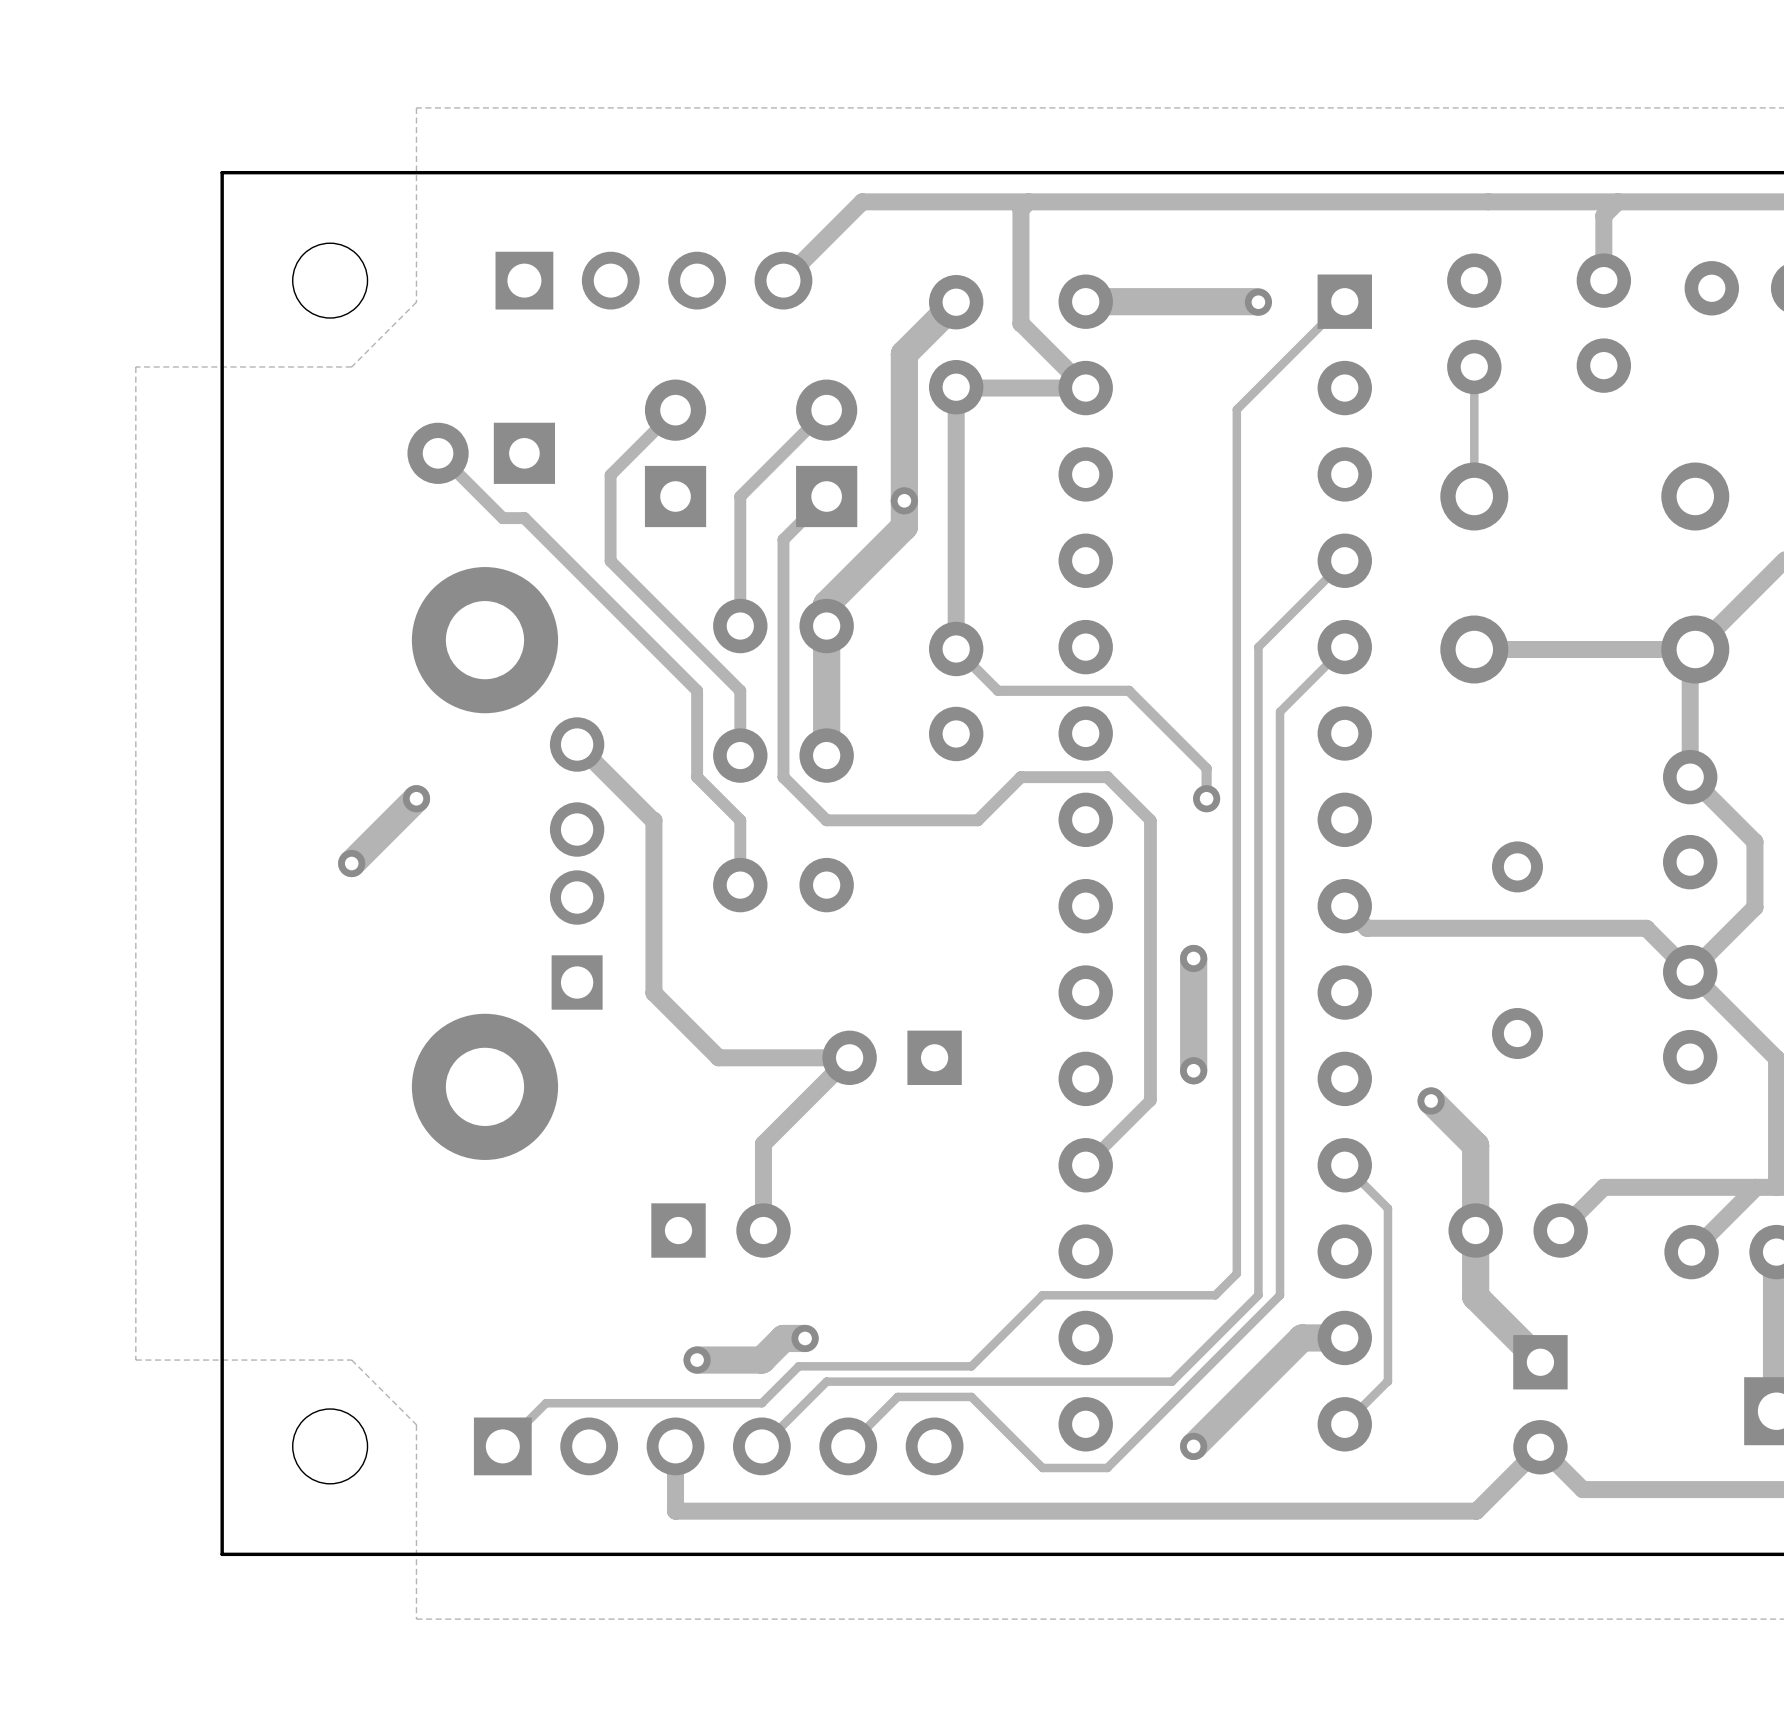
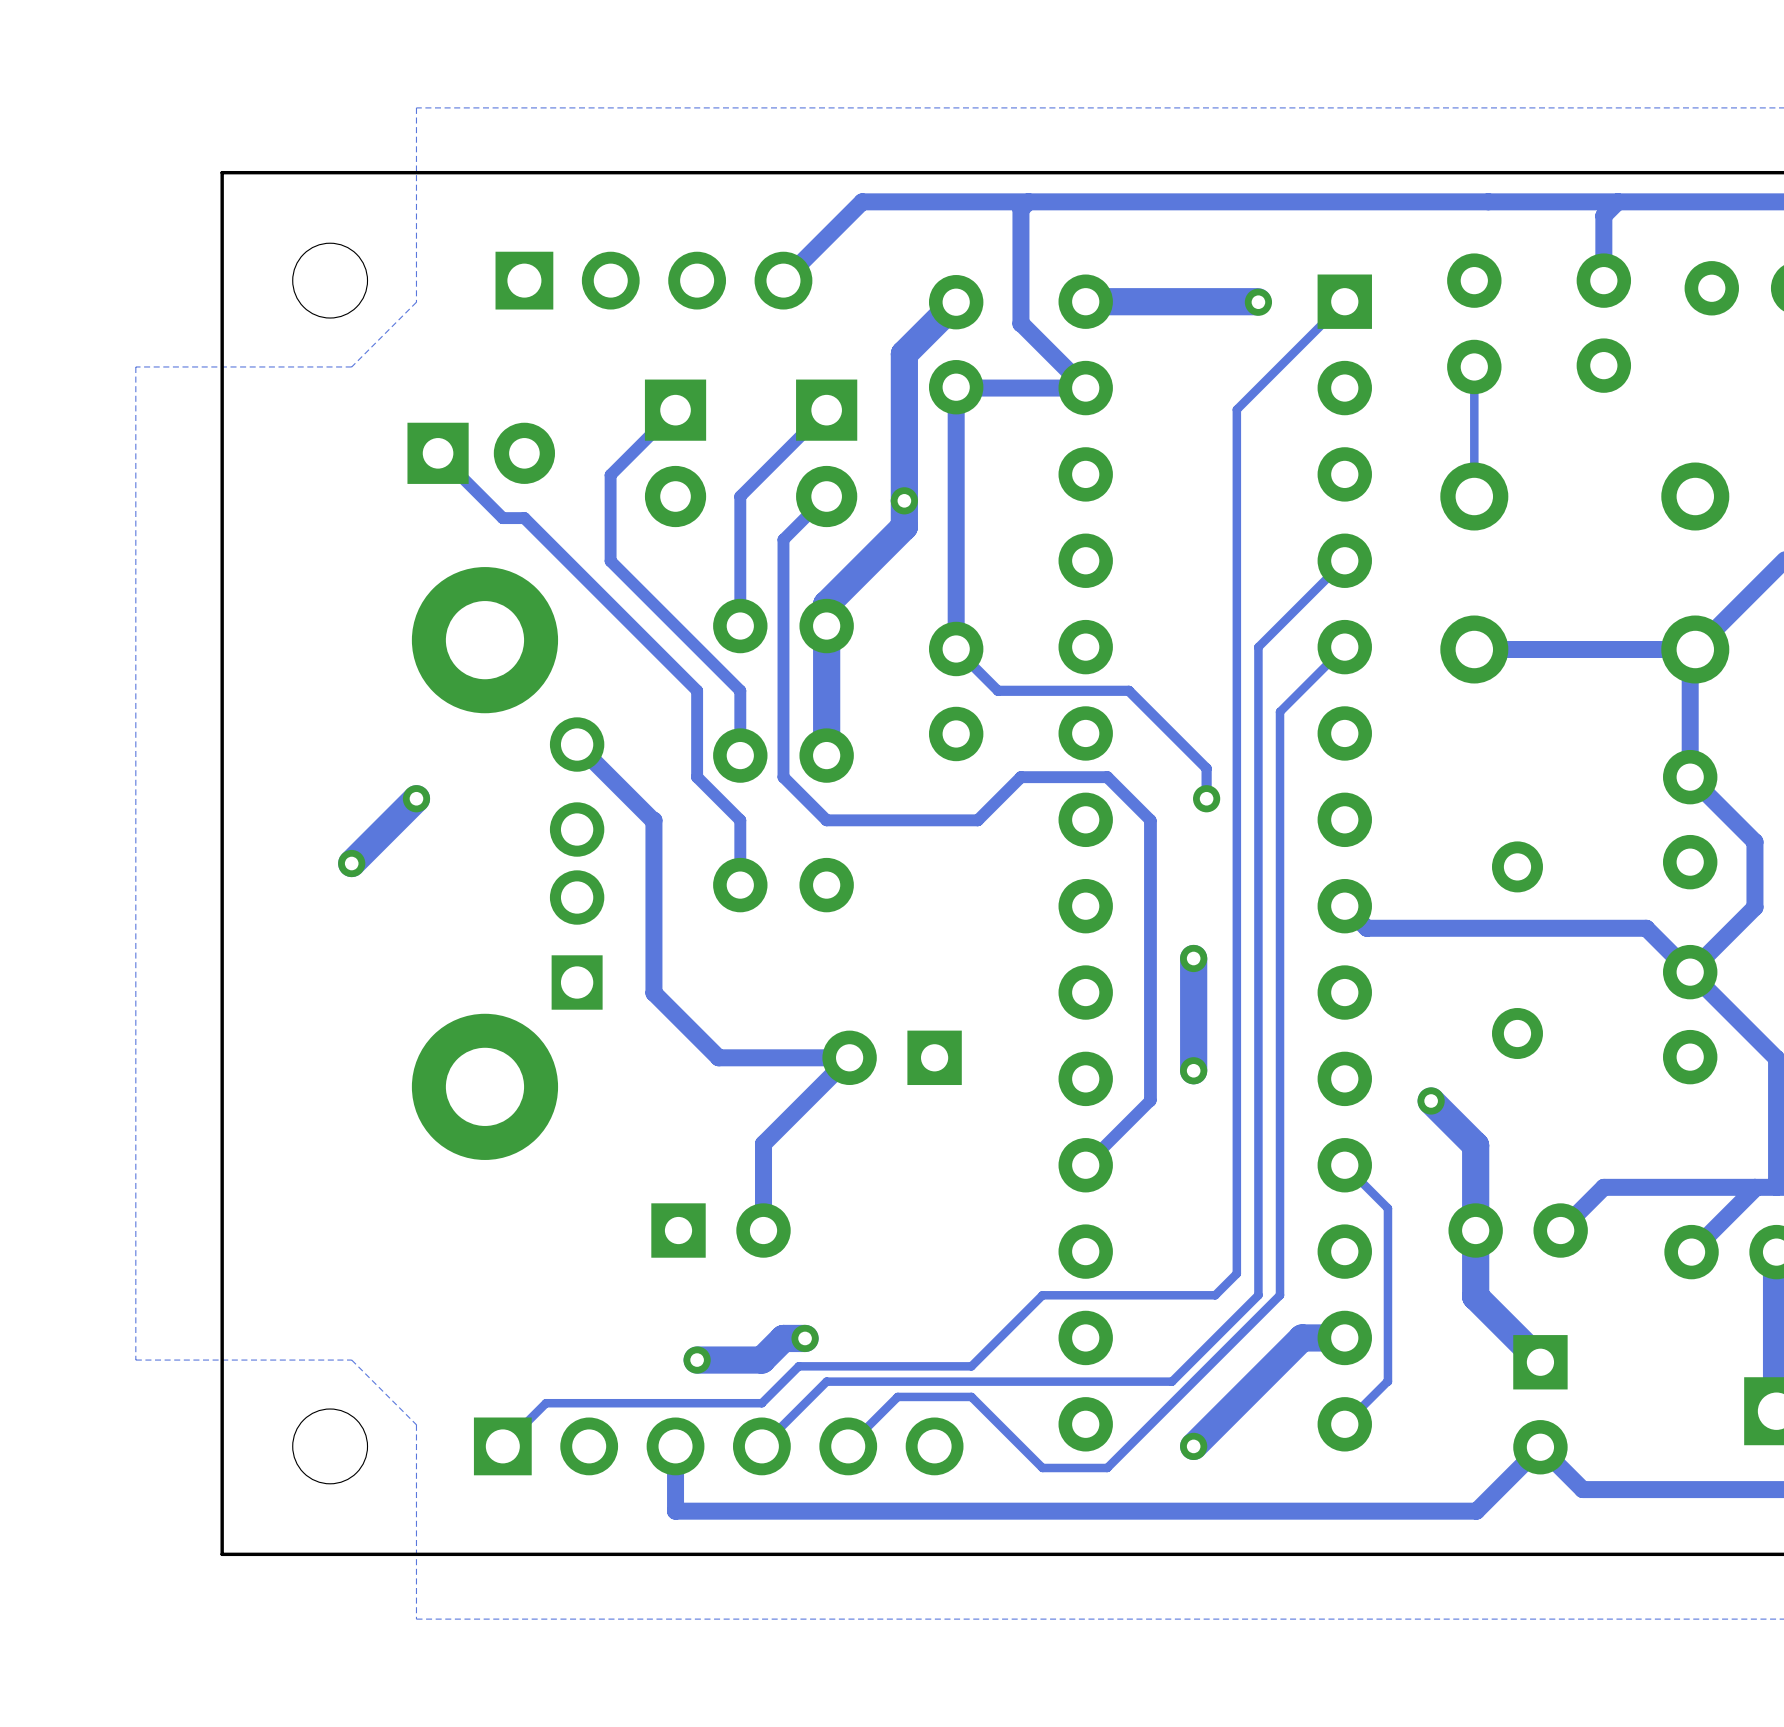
part rotation: 0° (481, 453) -> 180° (481, 453)
part rotation: 0° (675, 453) -> 180° (675, 453)
part rotation: 0° (826, 453) -> 180° (826, 453)

